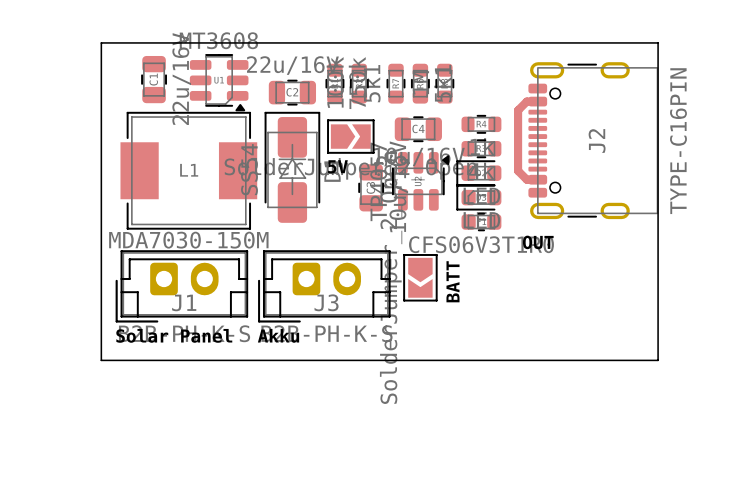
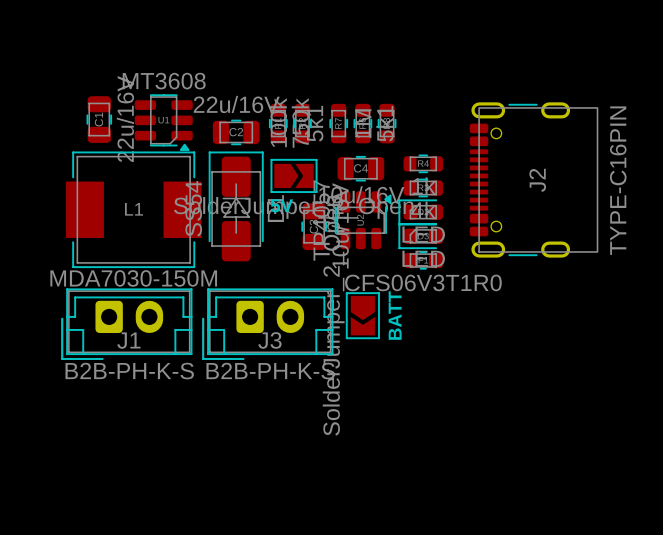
board edge: (101, 42) (101, 360) (658, 360) (658, 42) (101, 42) -> none
track: (537, 101) (526, 101) (518, 110) (518, 170) (526, 179) (537, 179) -> none
text: OUT (538, 242) -> none
text: Solar Panel (174, 335) -> none
text: Akku (278, 335) -> none

